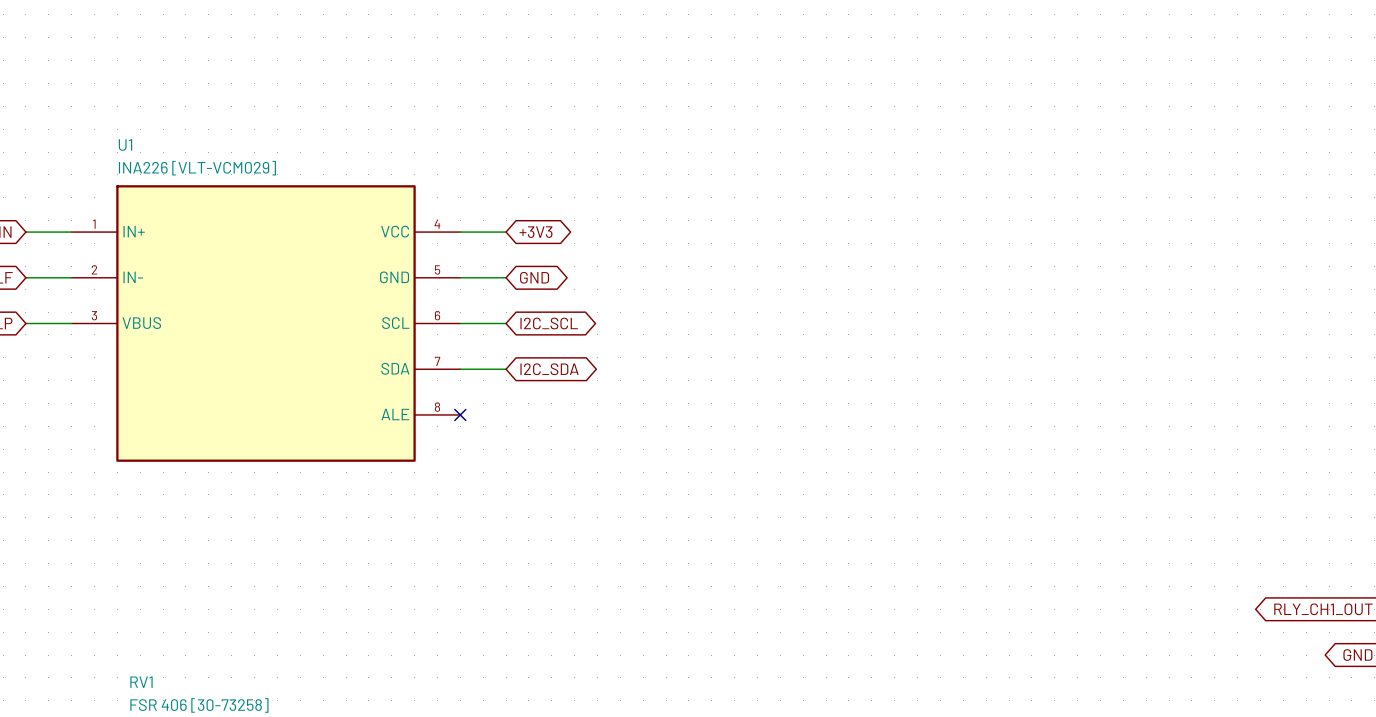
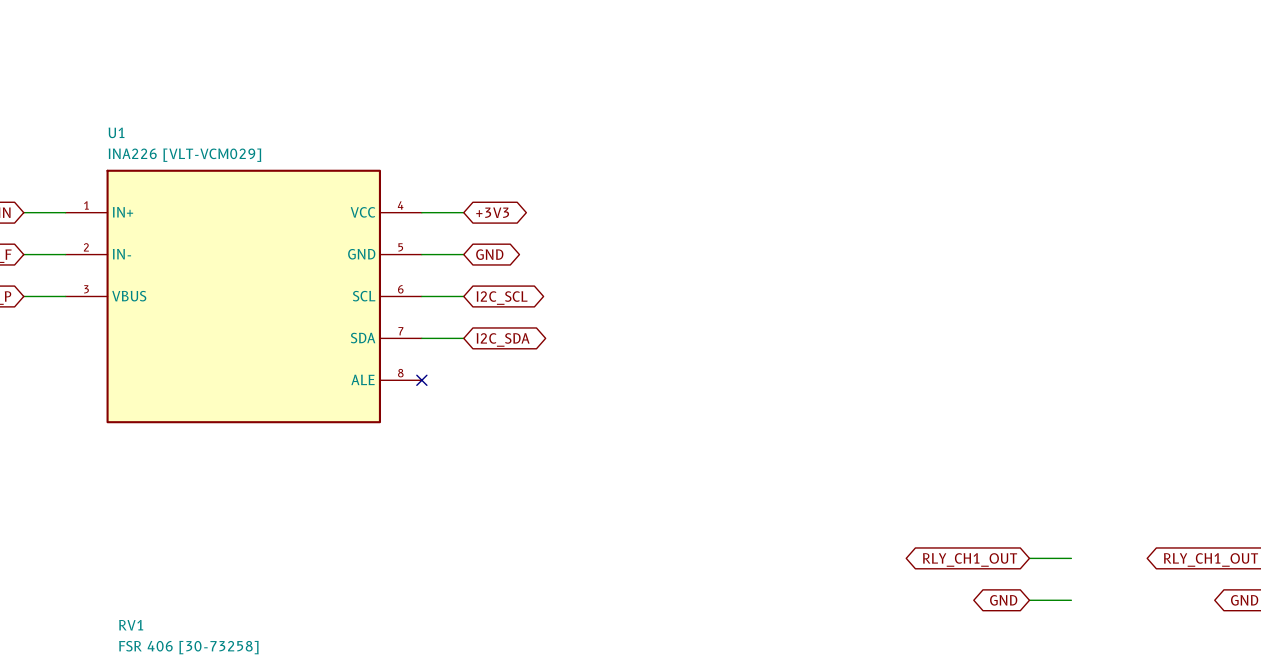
global label: none -> RLY_CH1_OUT (970, 559)
wire: none -> (1029, 558) (1071, 558)
global label: none -> GND (1003, 600)
wire: none -> (1029, 600) (1071, 600)

